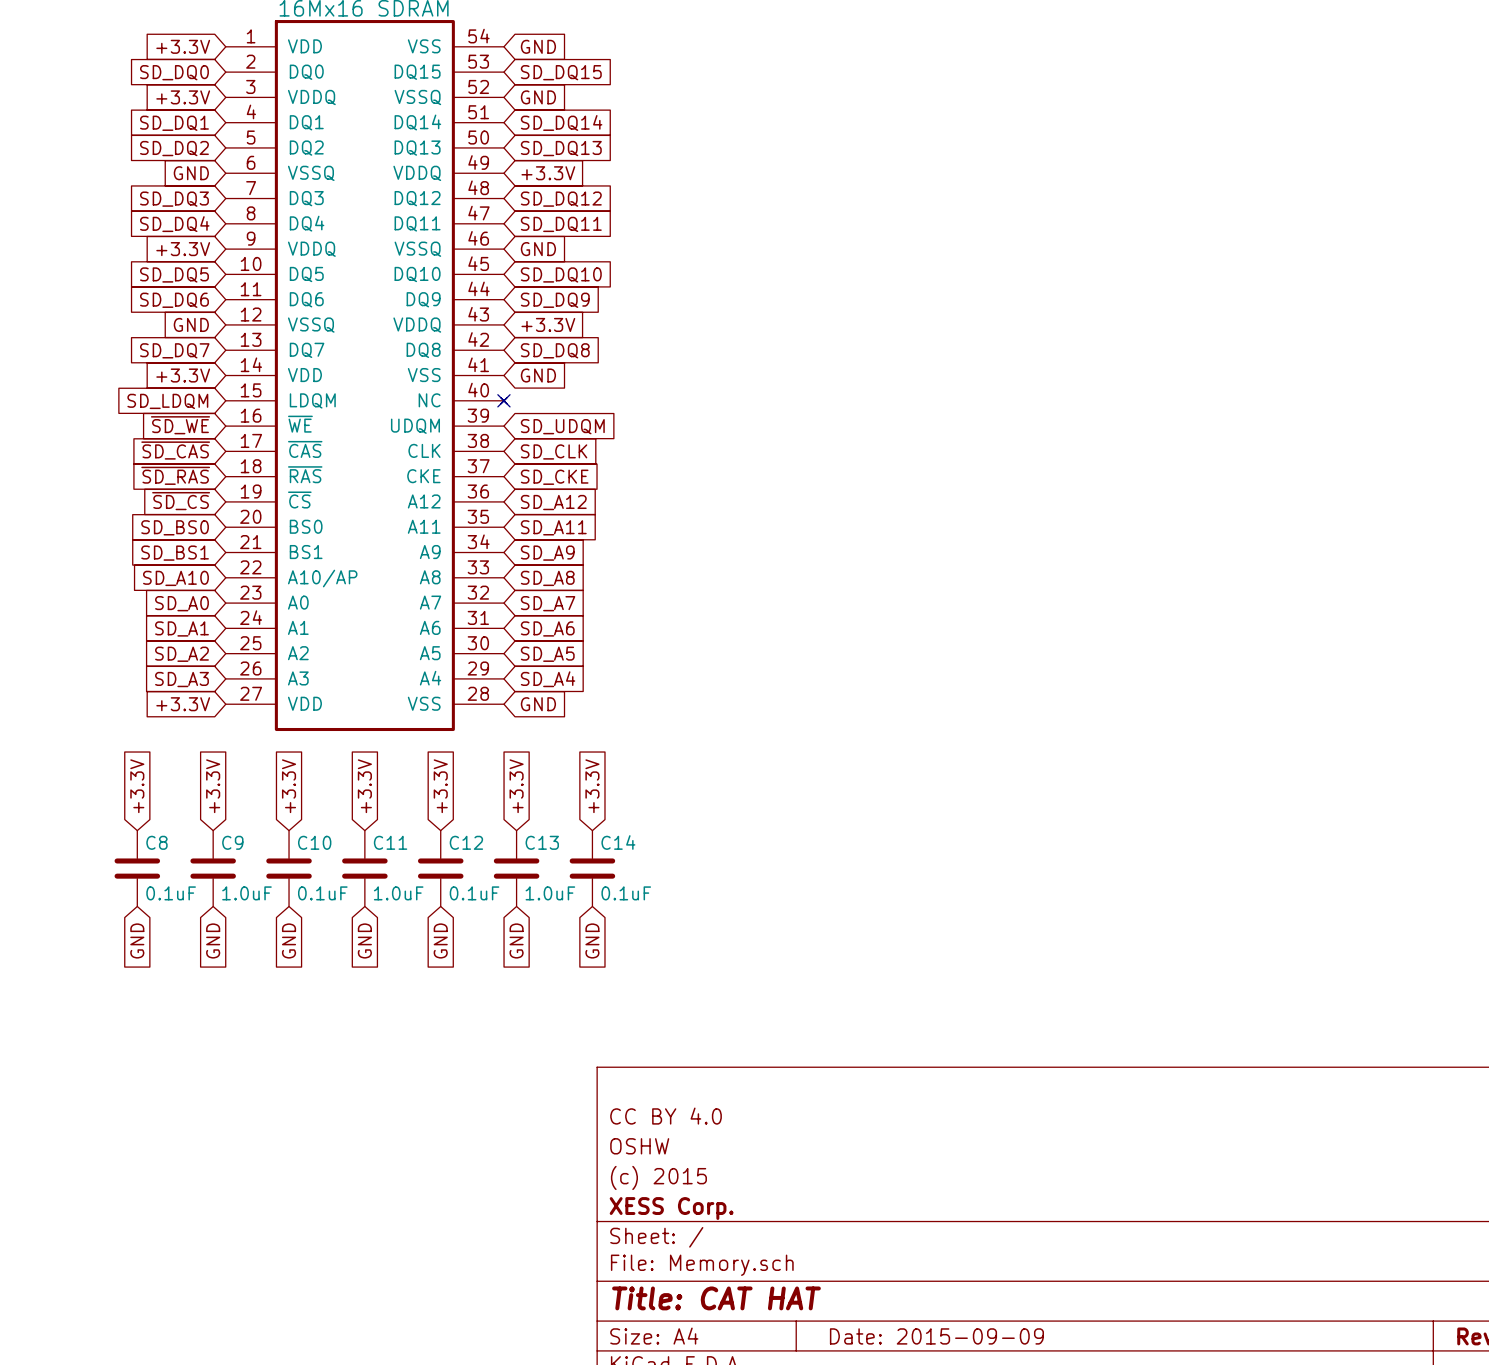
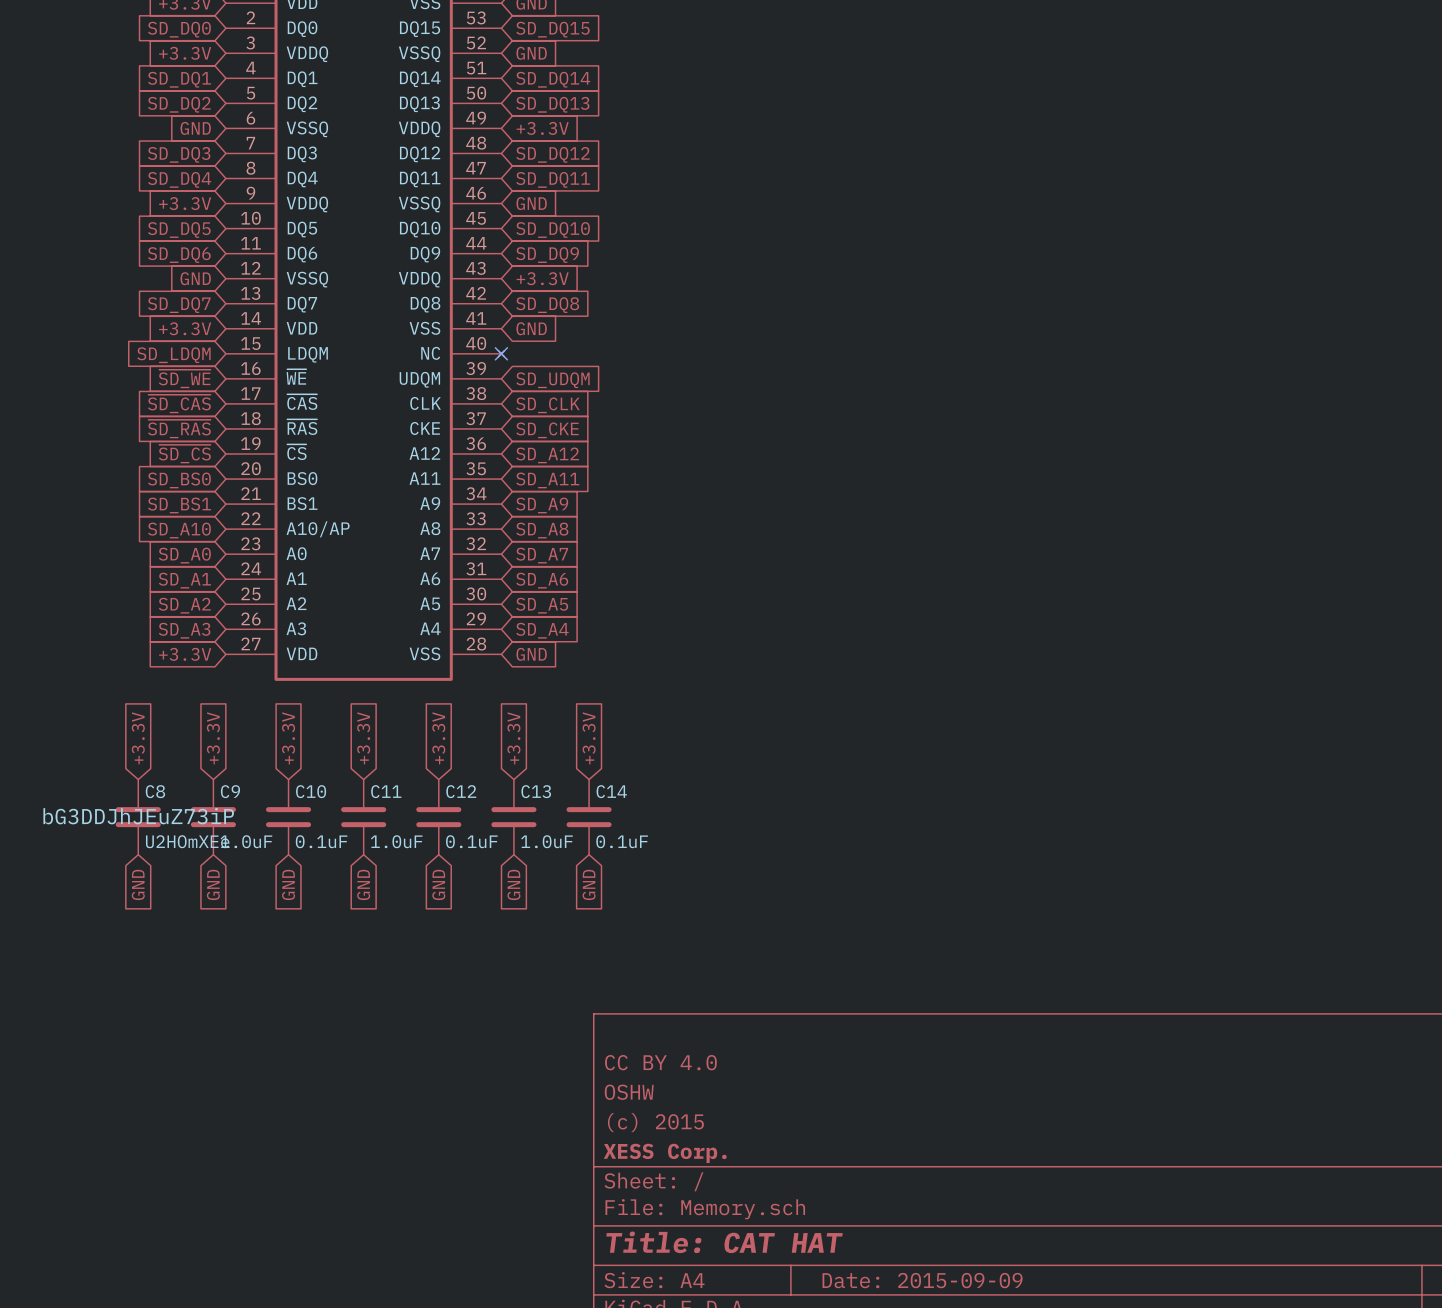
C8 text: none -> bG3DDJhJEuZ73iP (138, 816)
C8 value: 0.1uF (171, 893) -> U2HOmXEe (187, 841)

